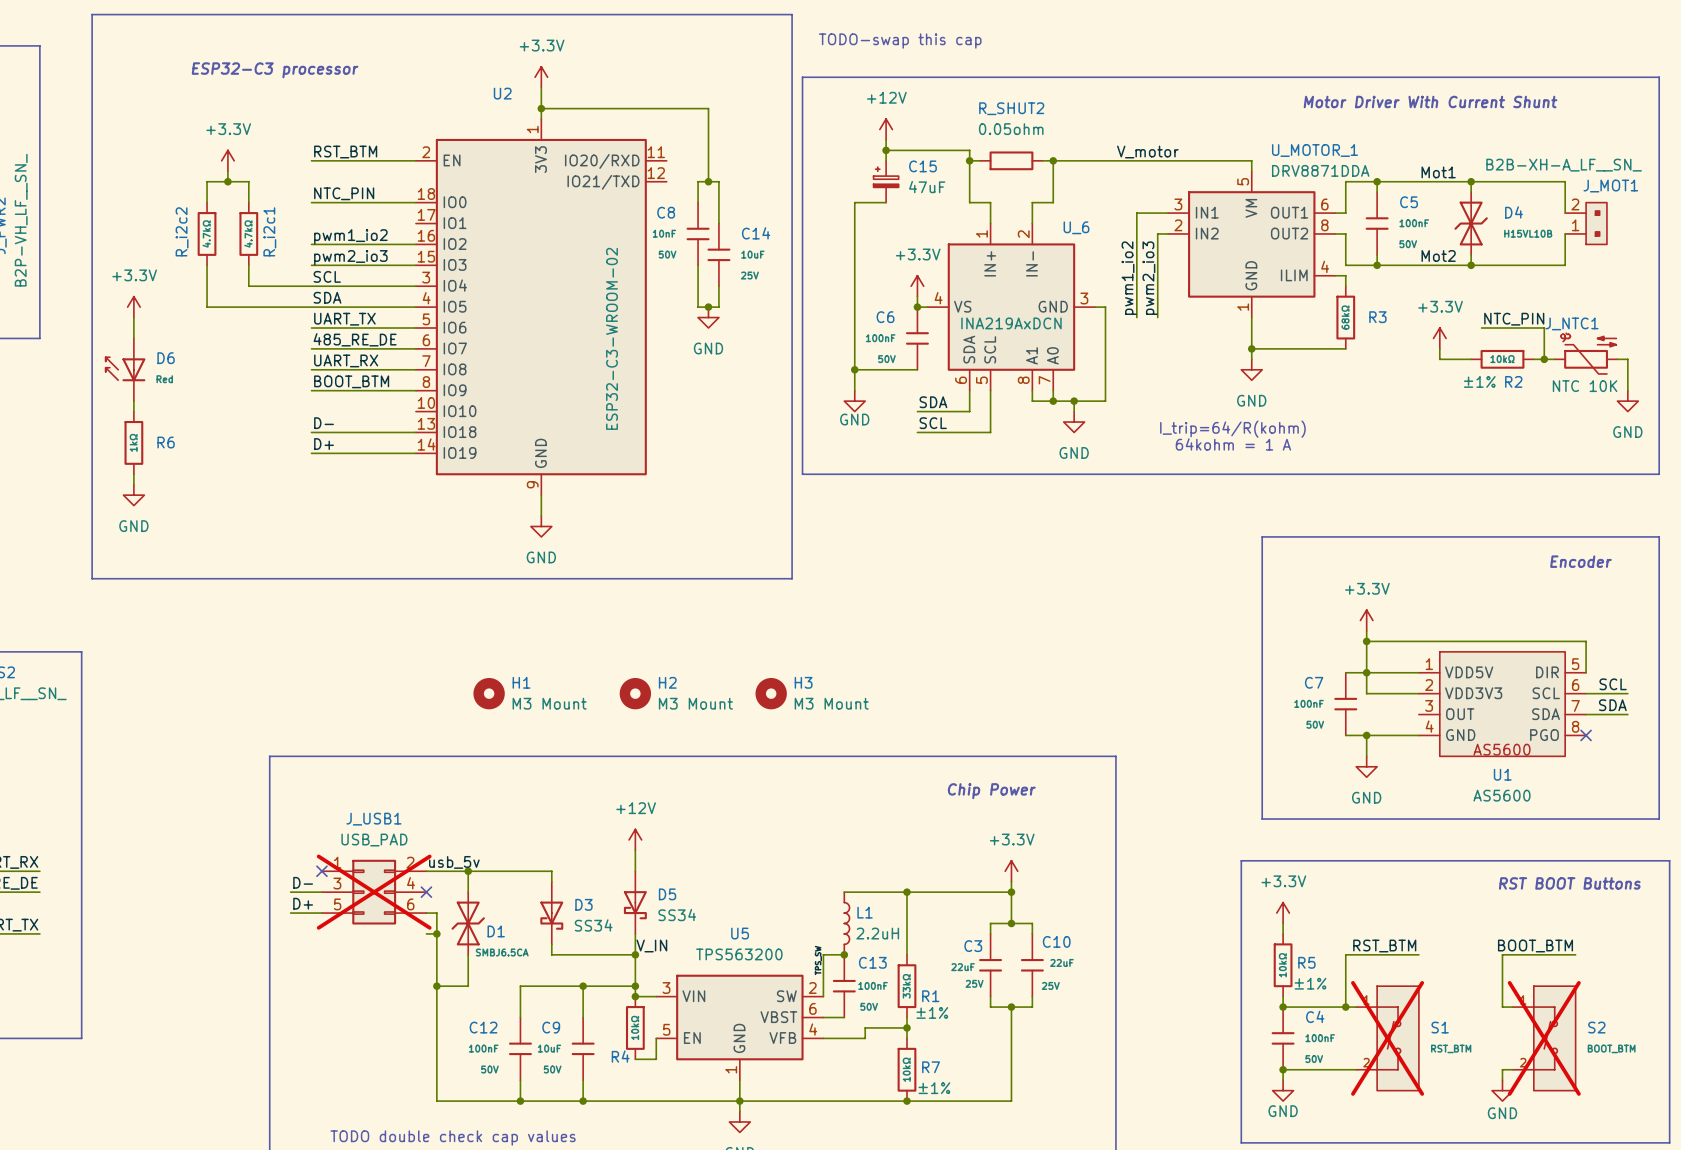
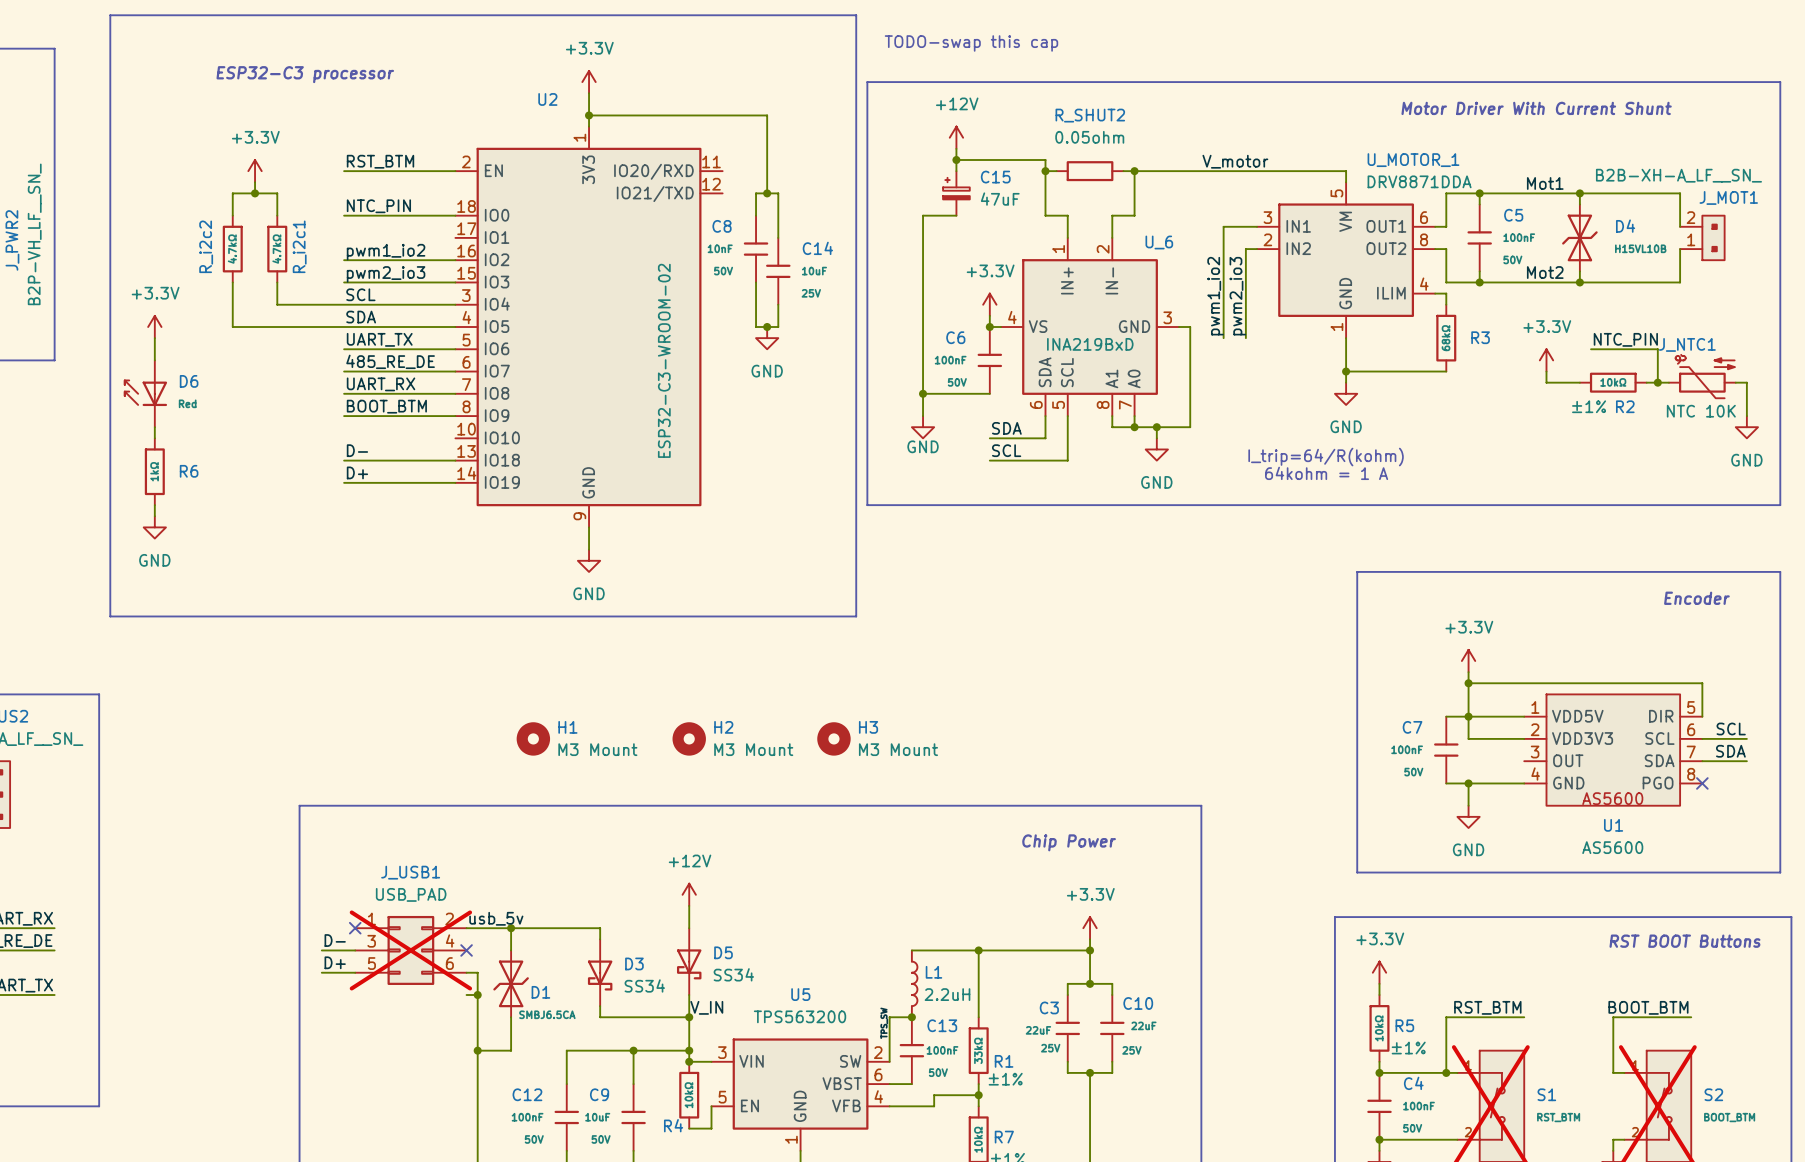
U_6 value: INA219AxDCN (1011, 323) -> INA219BxD (1090, 344)

